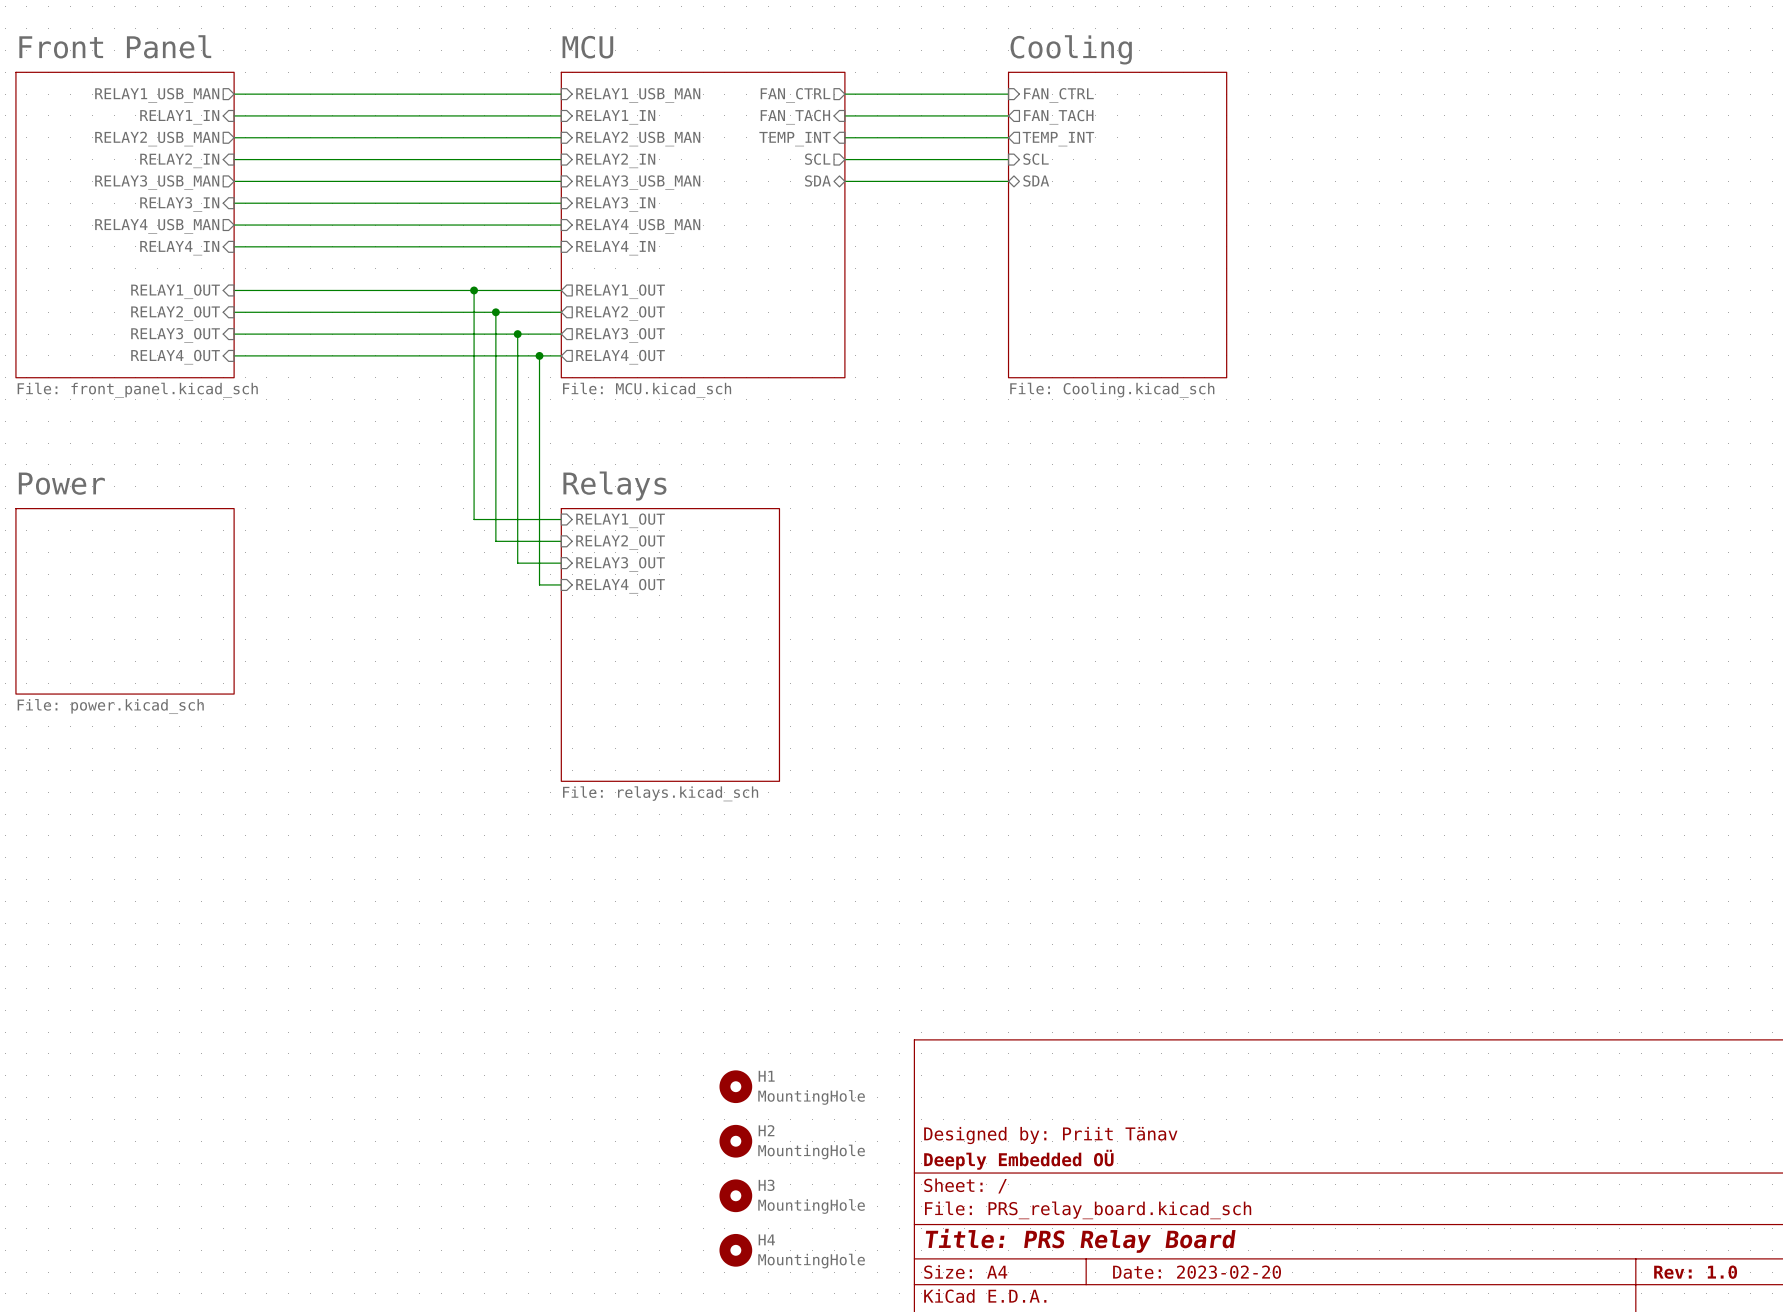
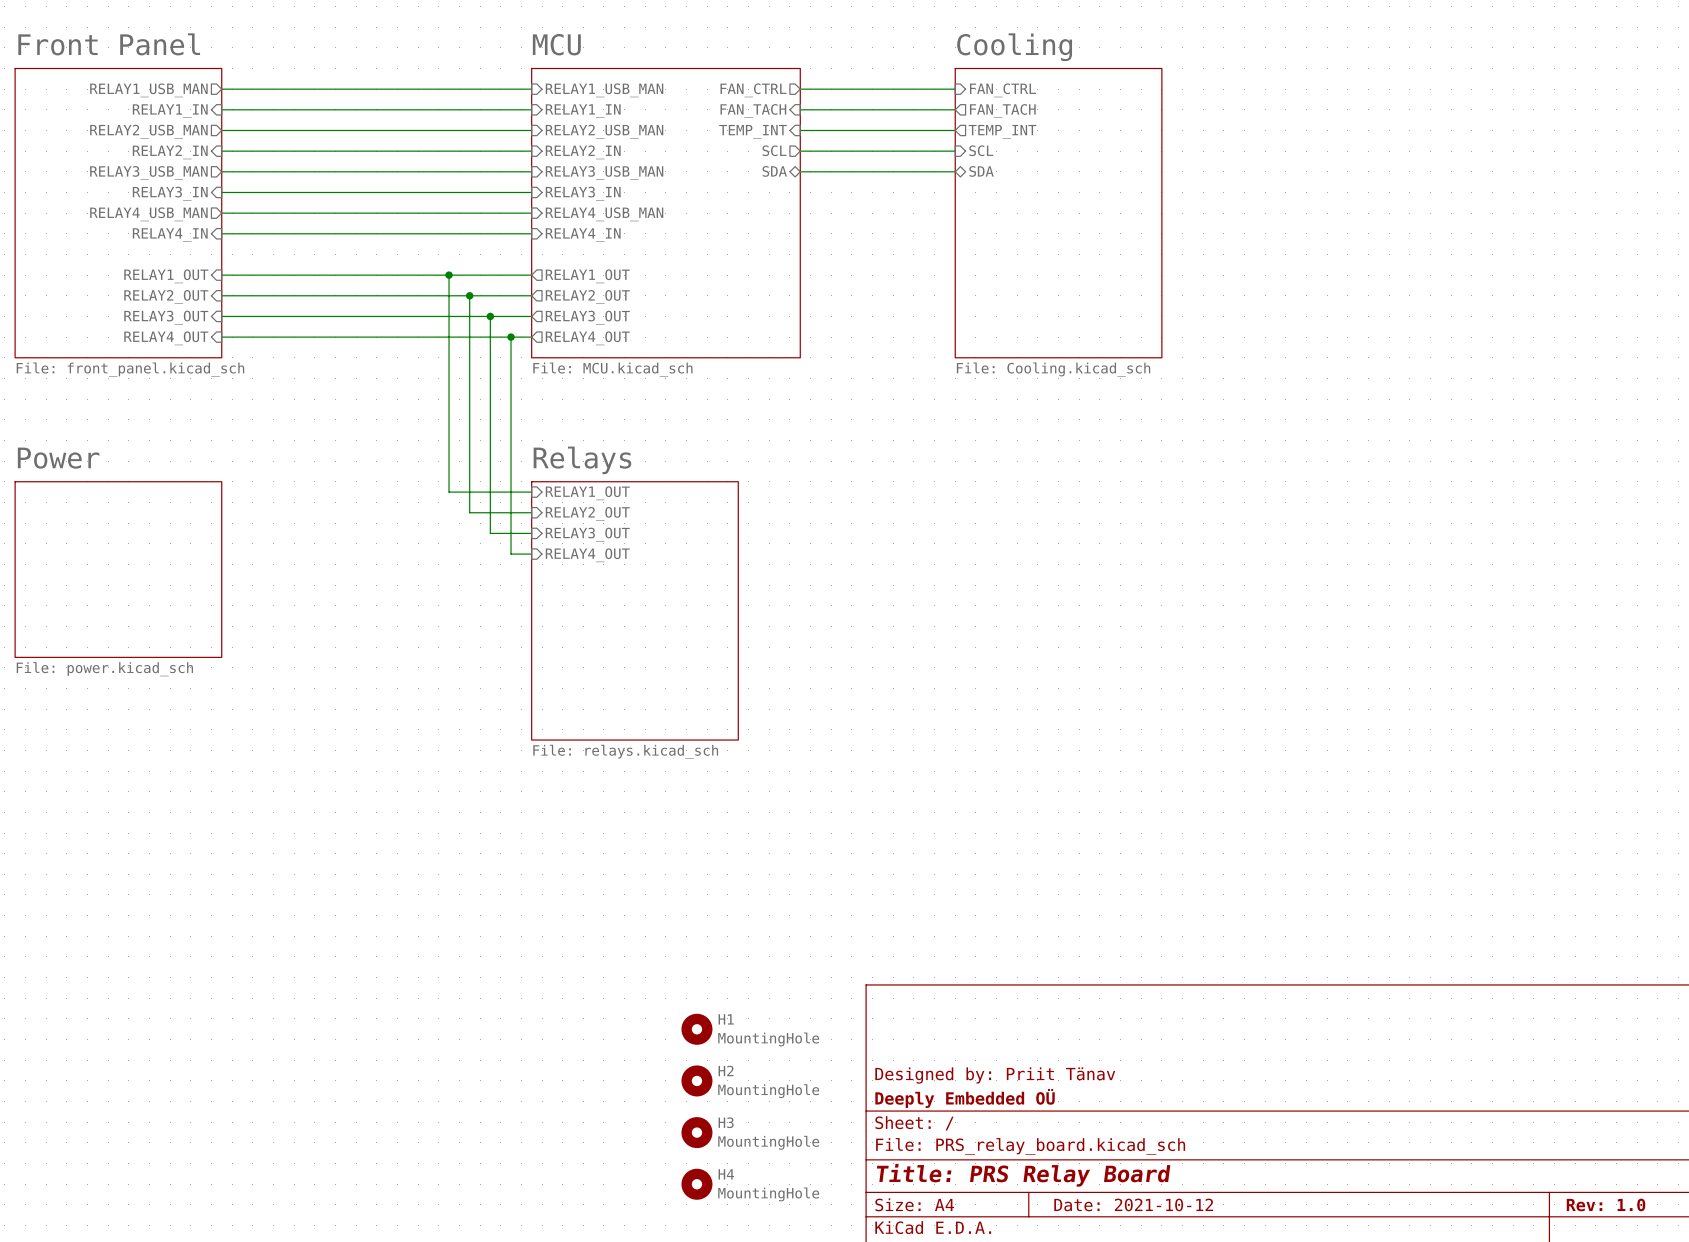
title block: Date: 2023-02-20 (1197, 1272) -> Date: 2021-10-12 (1133, 1204)

